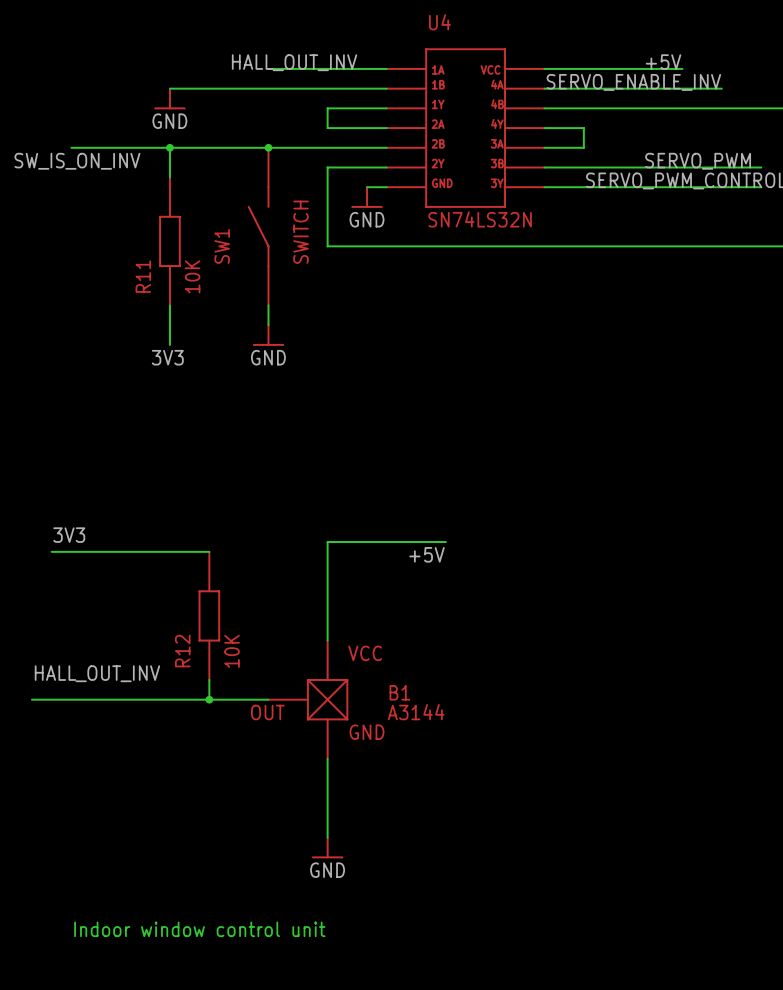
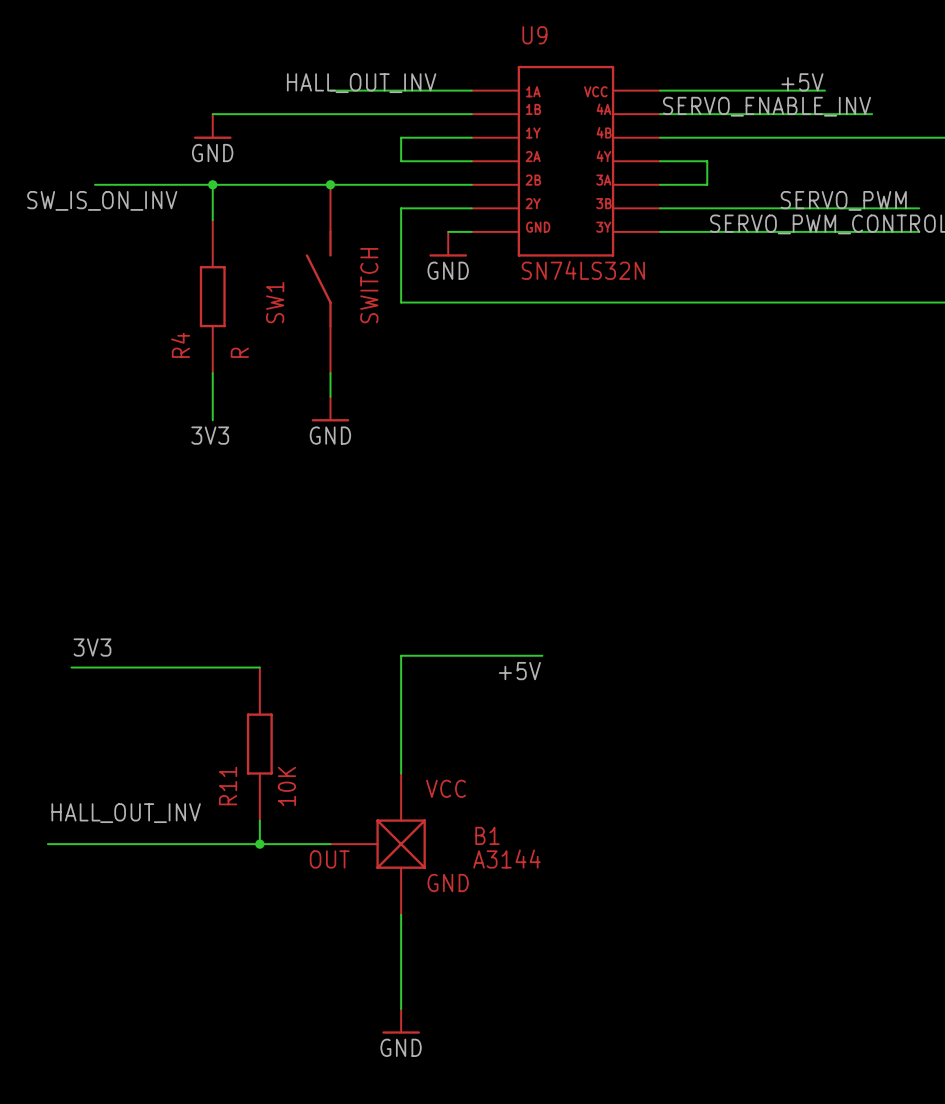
U4 name: U4 (439, 22) -> U9 (534, 35)
R11 name: R11 (143, 276) -> R4 (180, 345)
R11 value: 10K (192, 276) -> R (239, 352)
R12 name: R12 (182, 651) -> R11 (228, 786)

